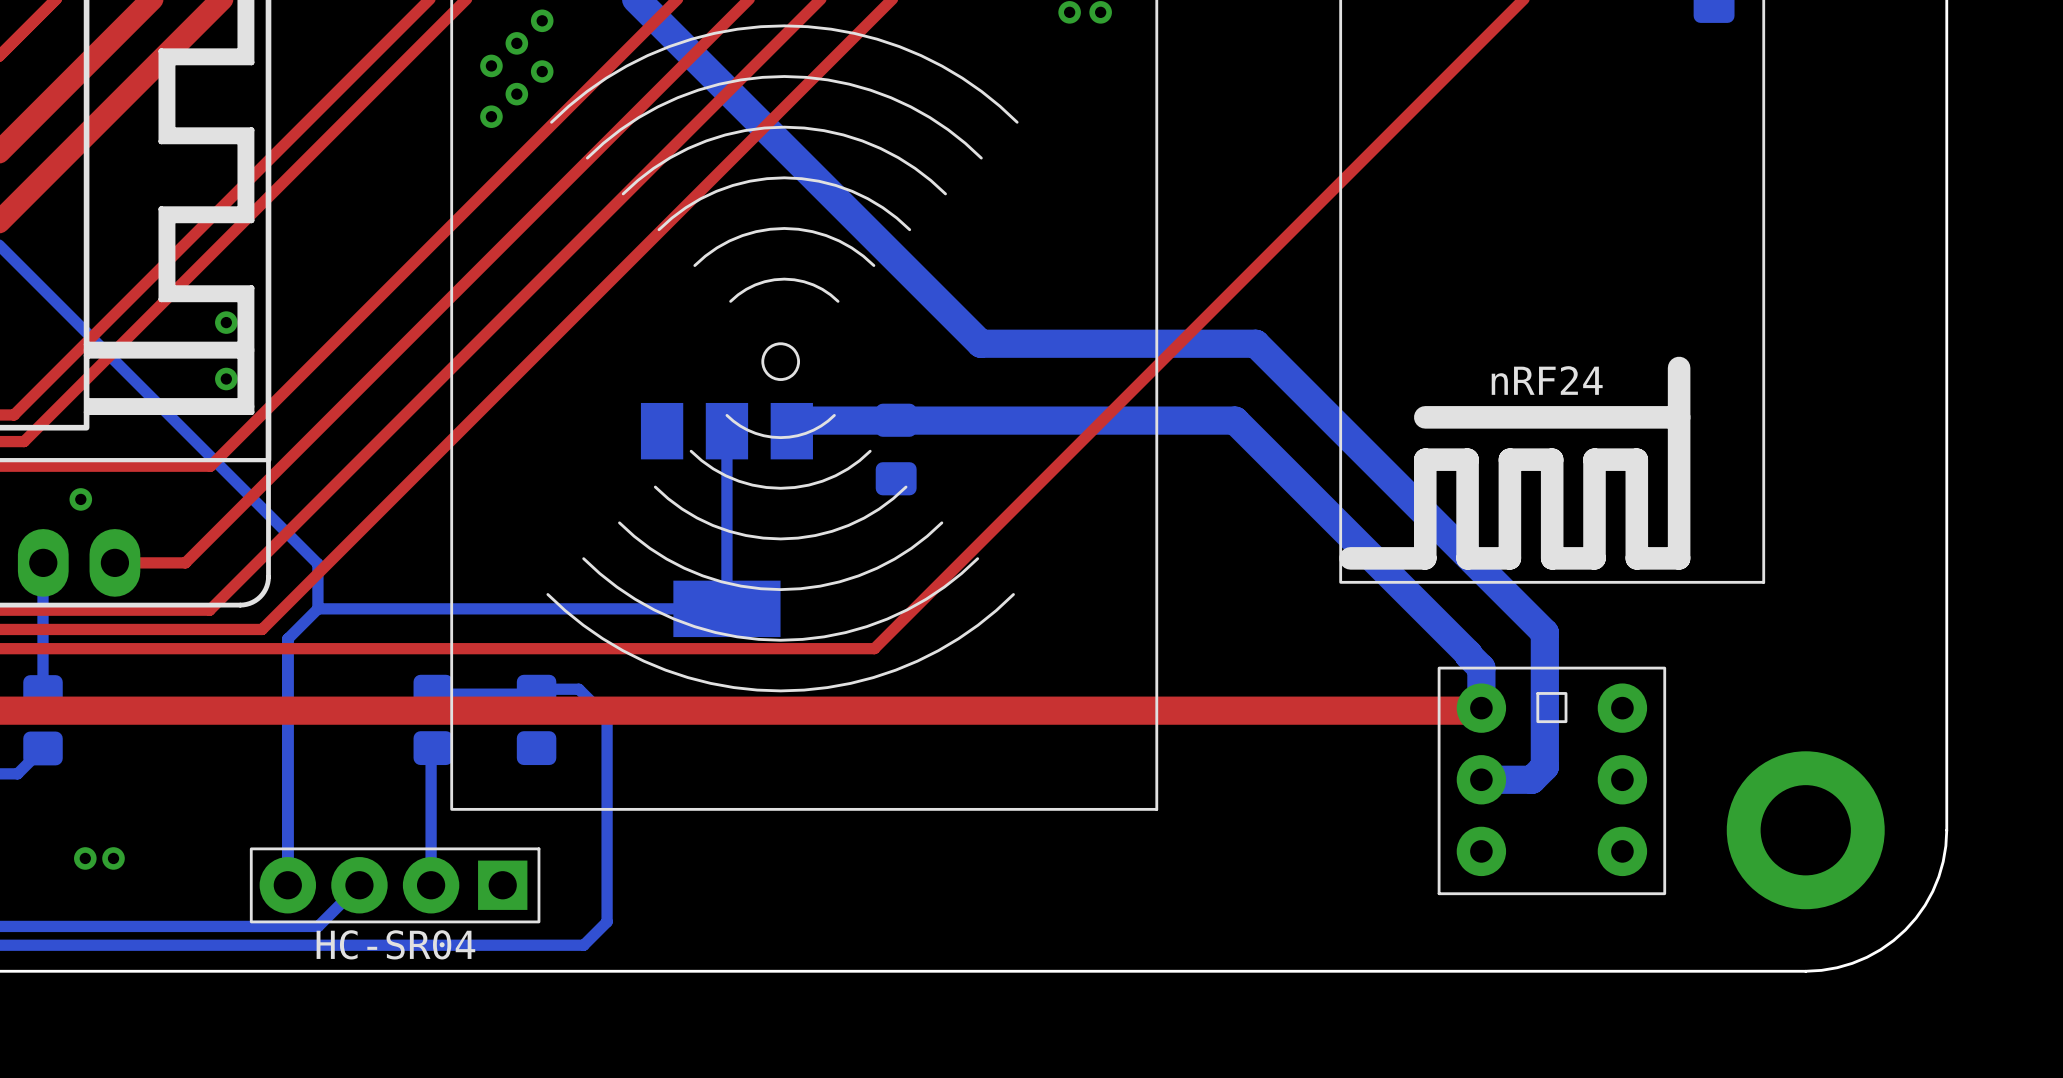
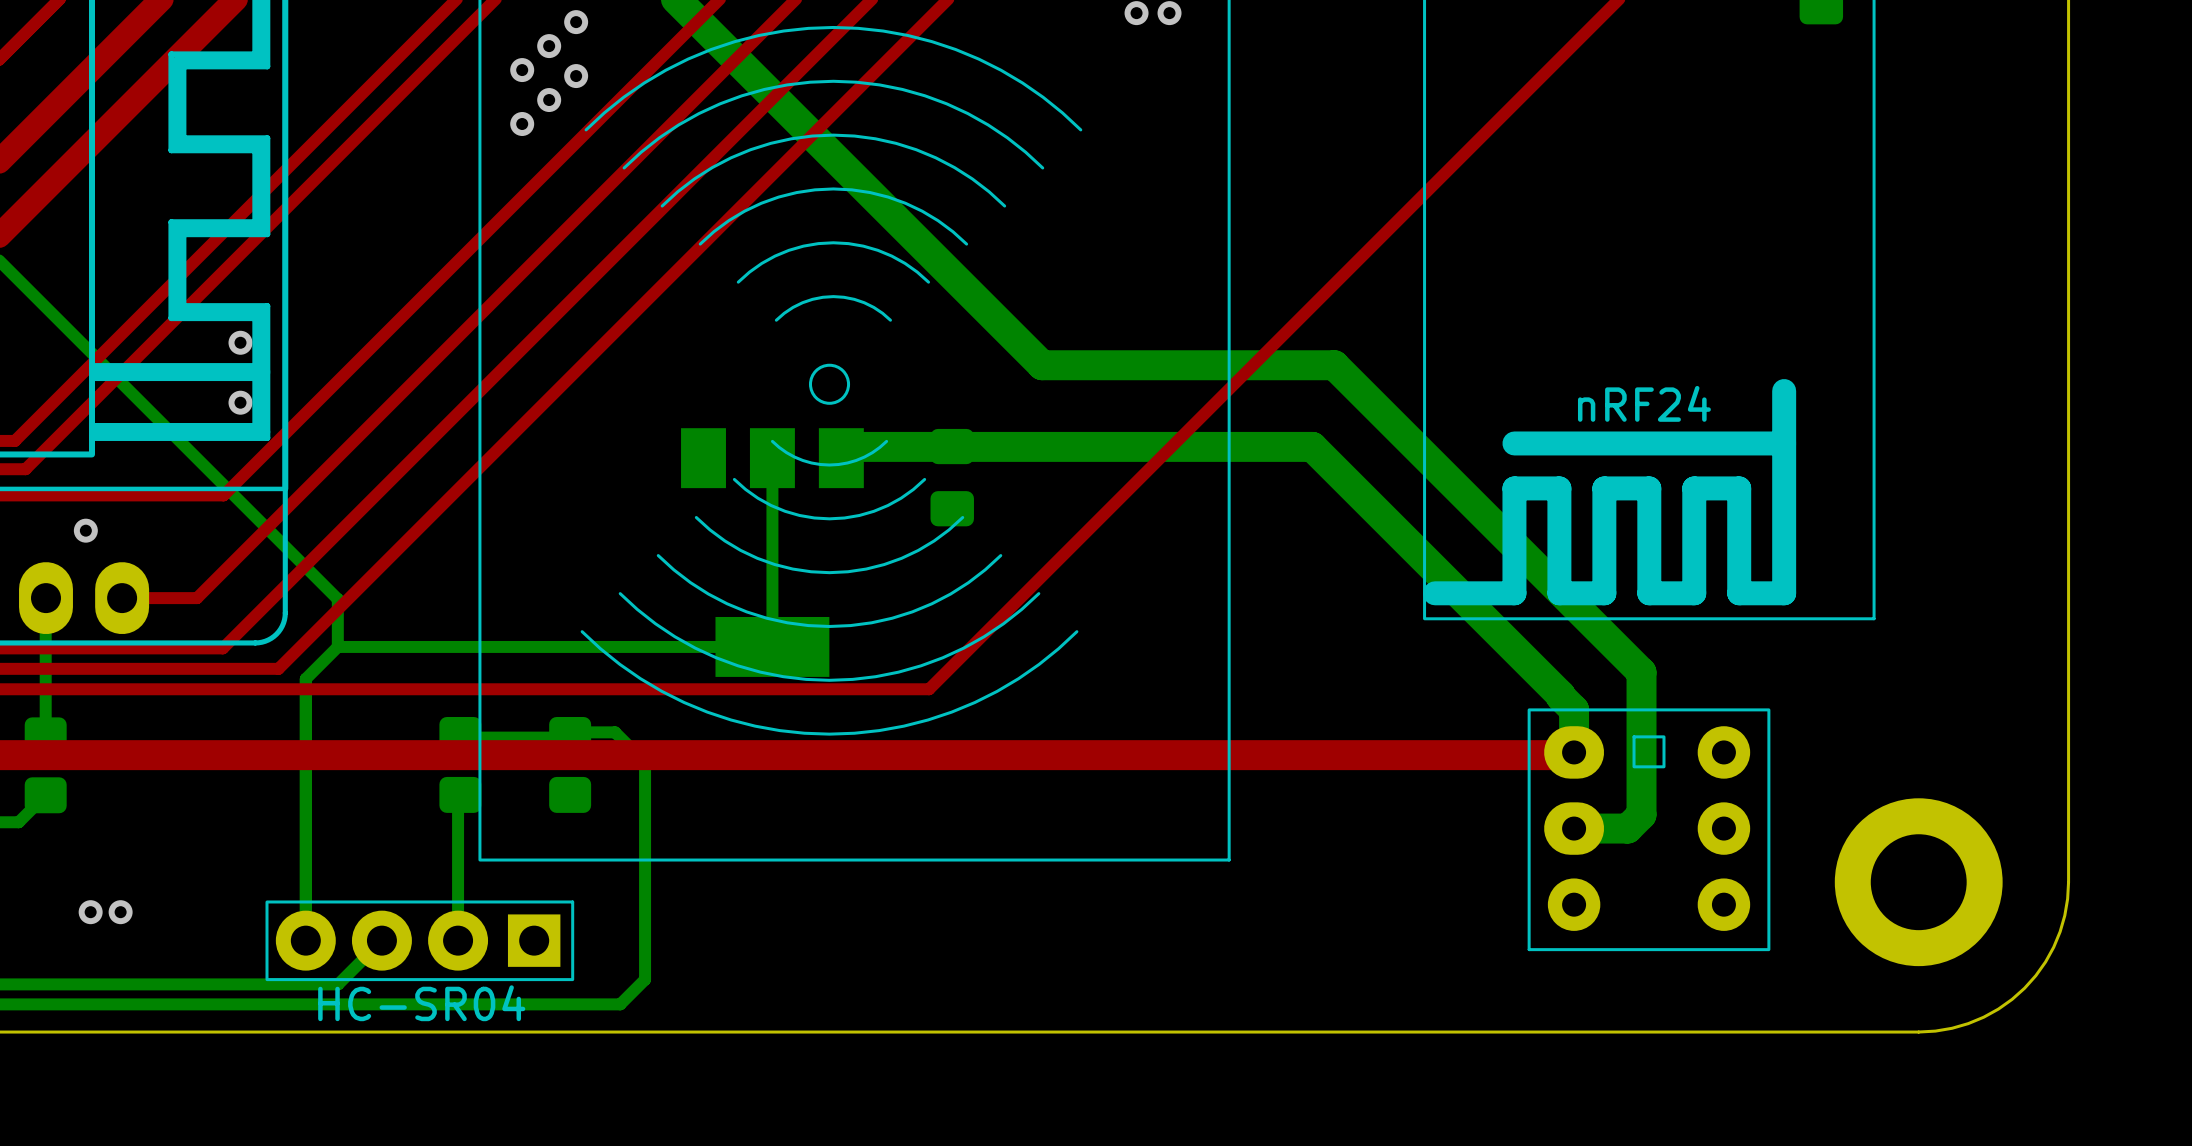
part footprint: [1437, 666, 1667, 896] -> [1527, 708, 1771, 952]

